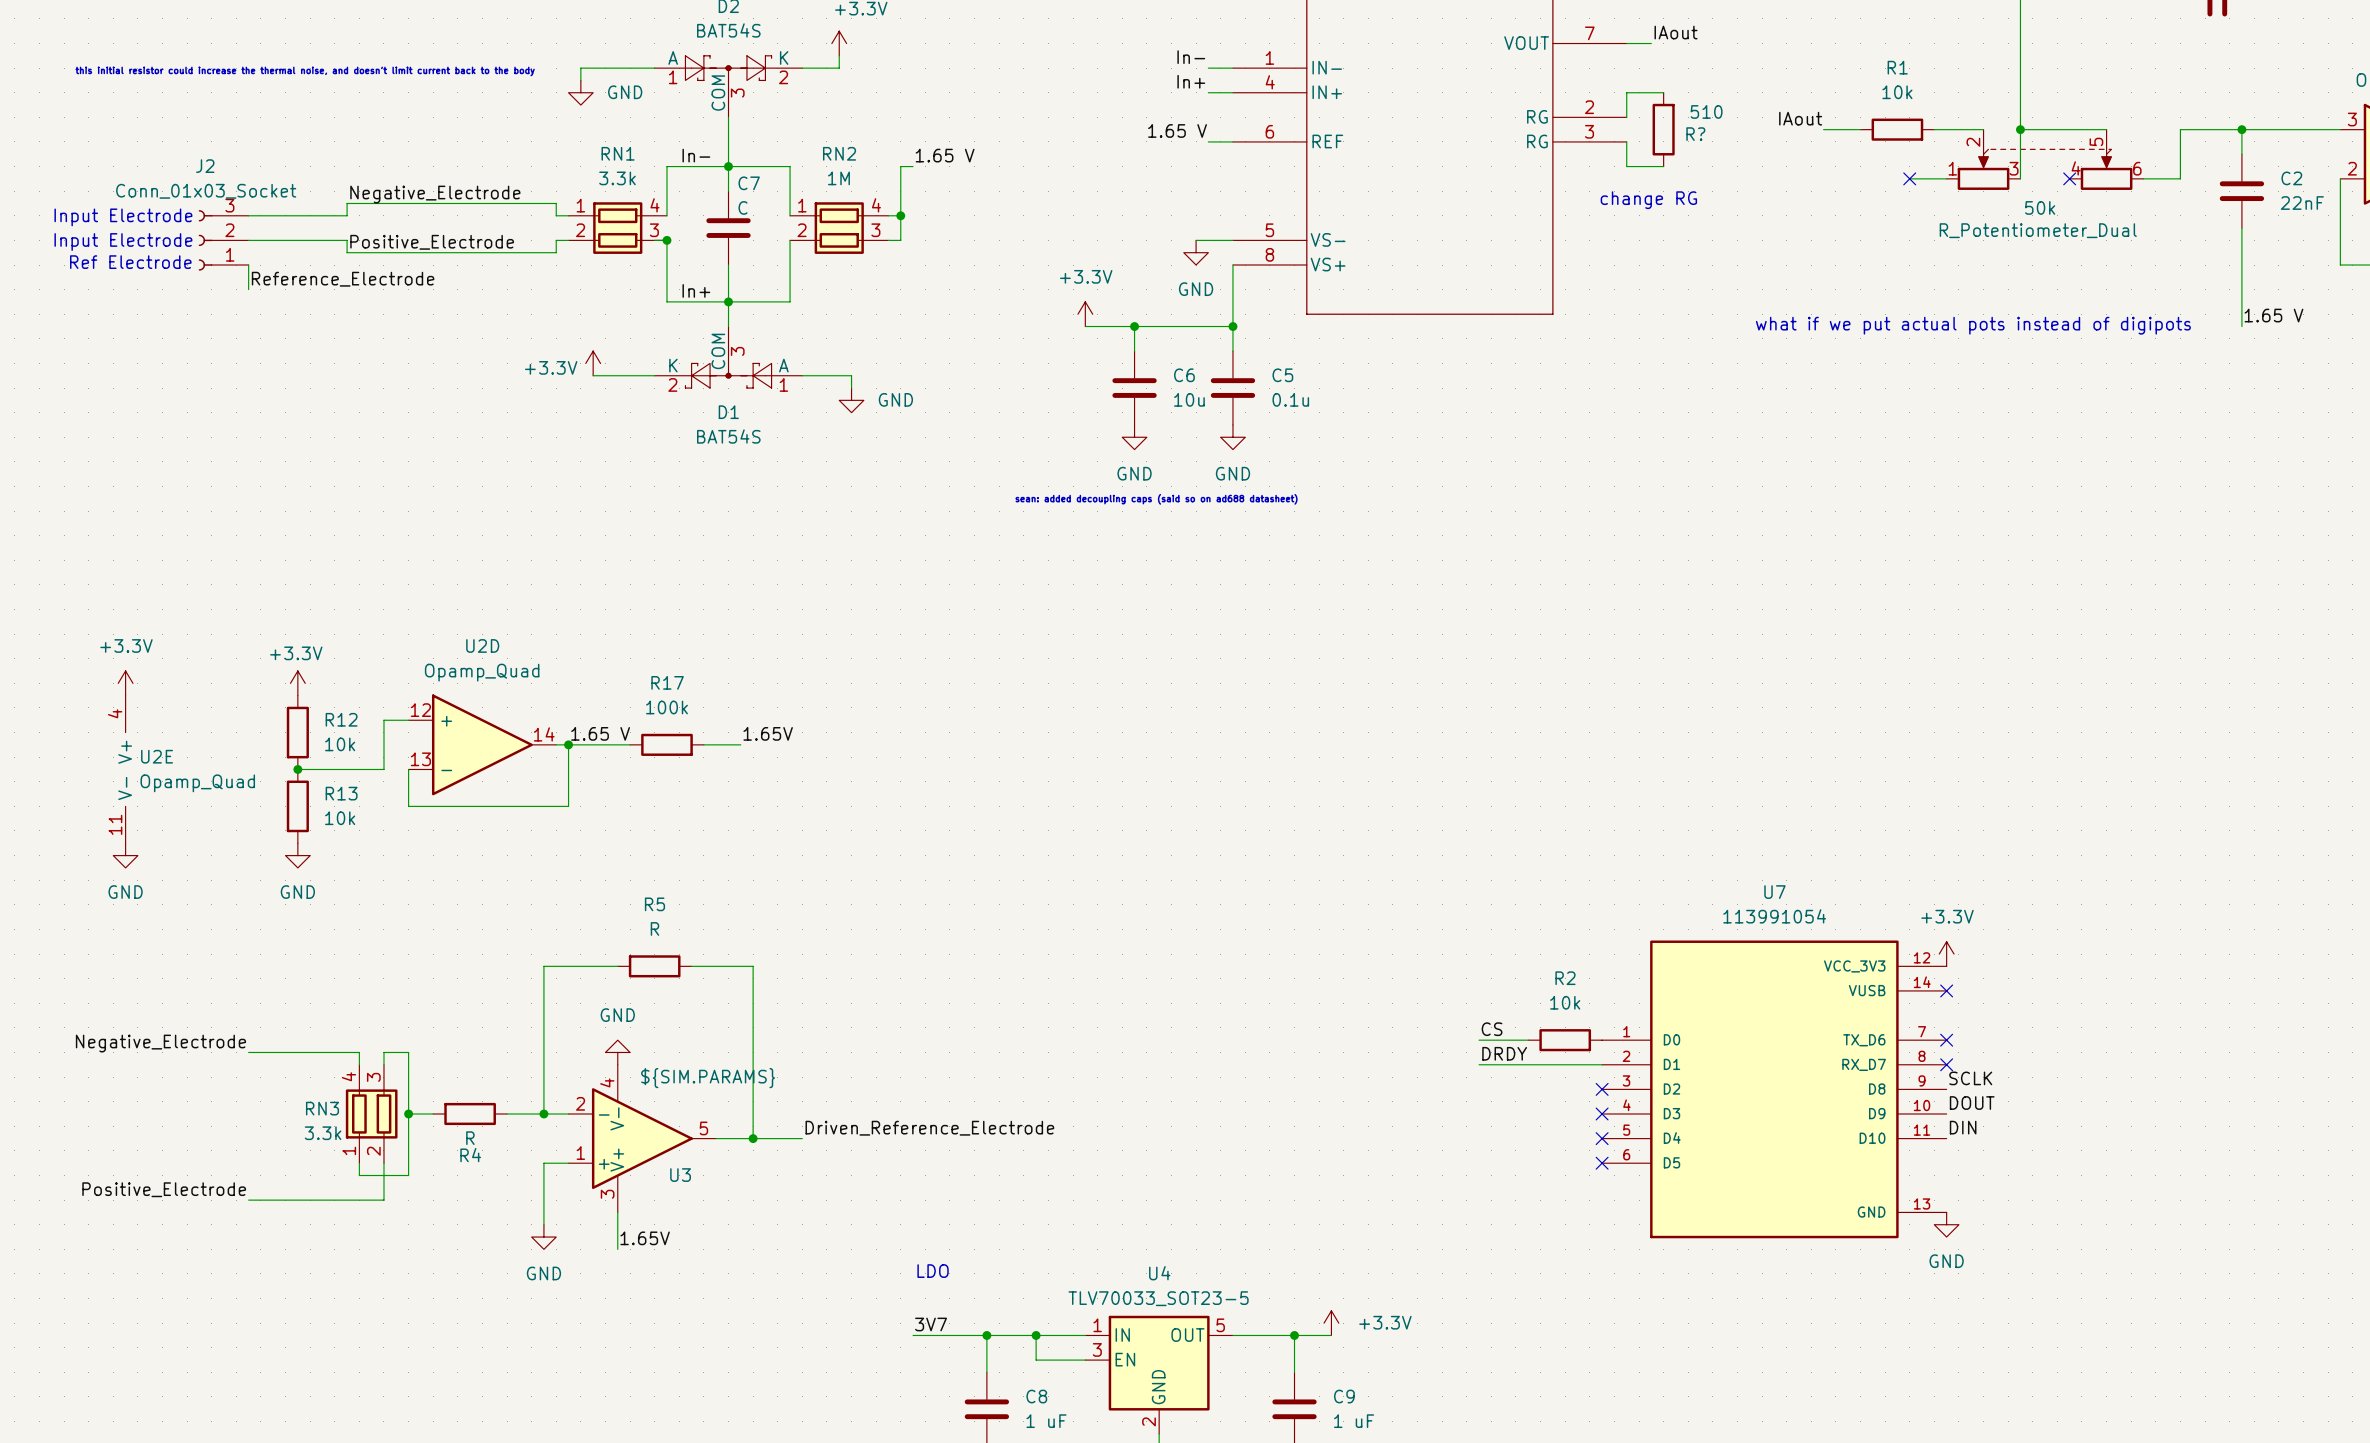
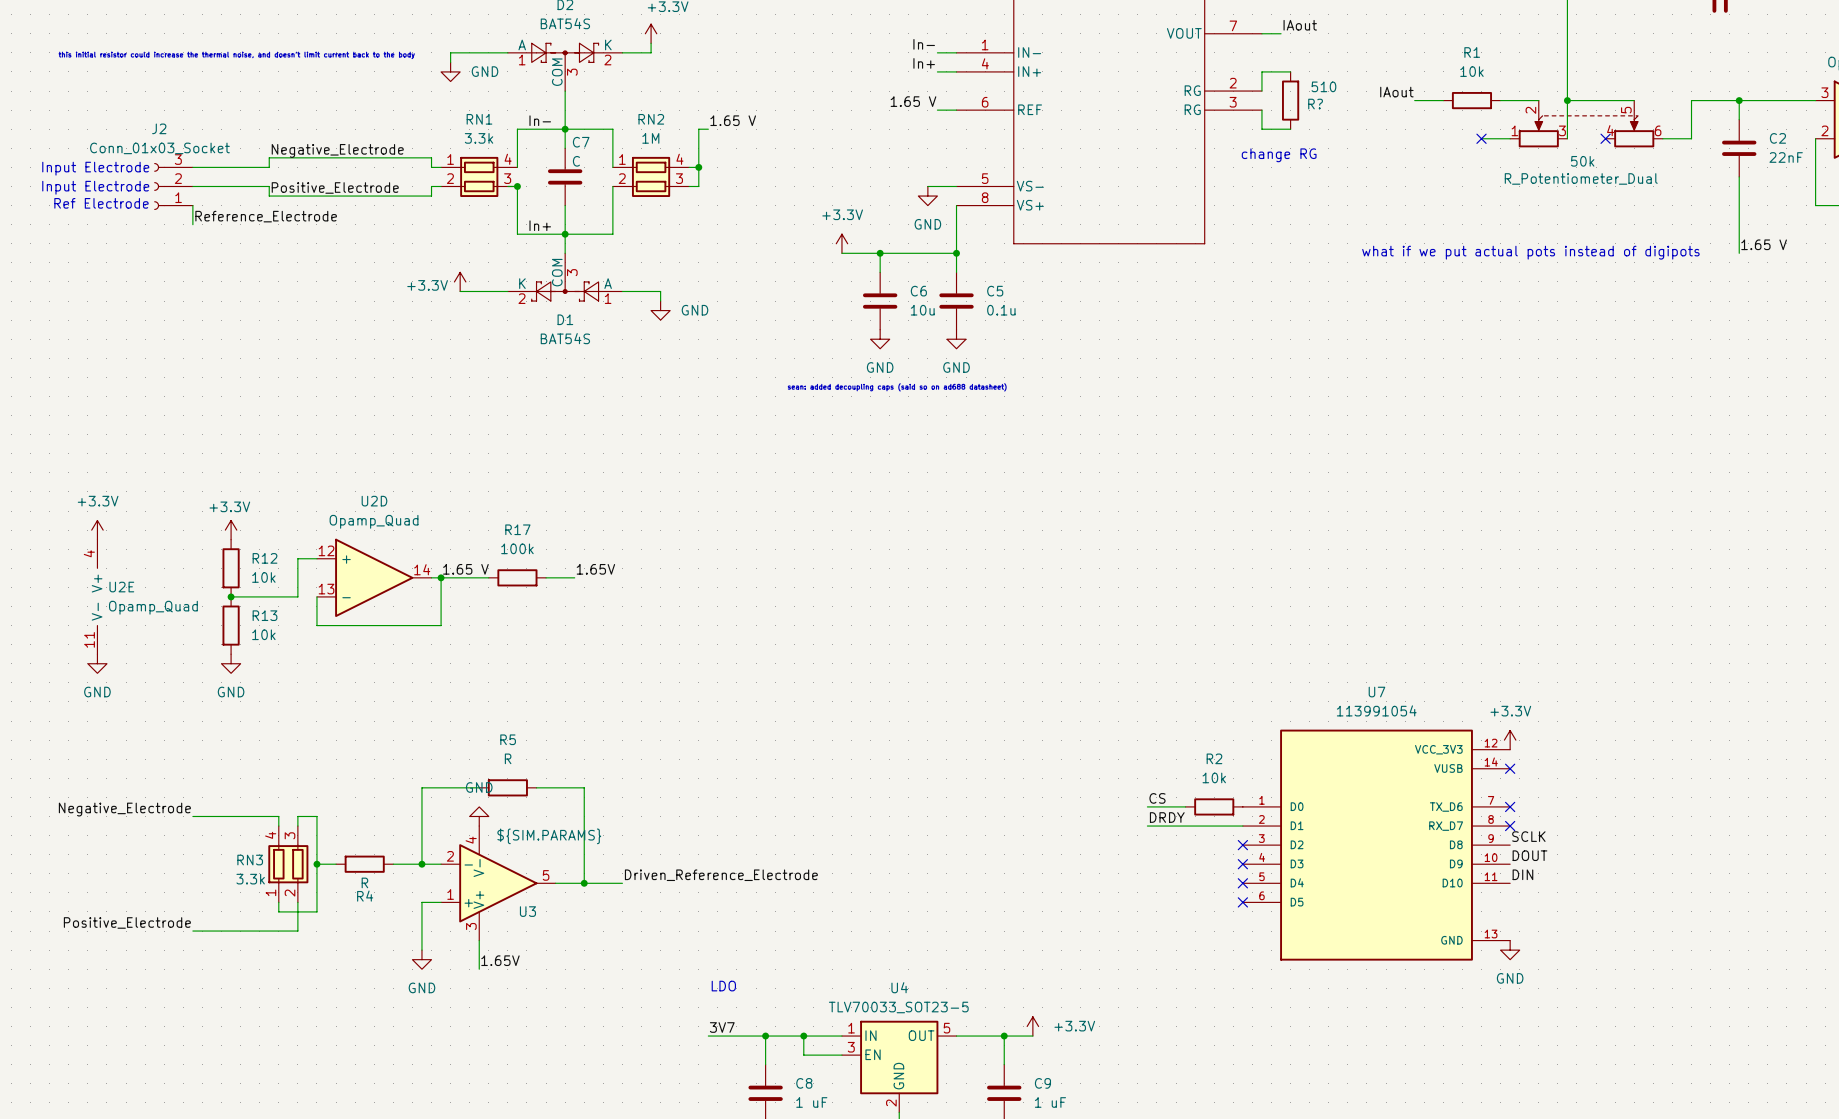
wire: (617, 966) (543, 966) (543, 1015) -> (479, 787) (421, 787)
R5 position: (654, 966) -> (507, 787)
wire: (691, 966) (753, 966) (753, 1015) -> (536, 787) (584, 787)

